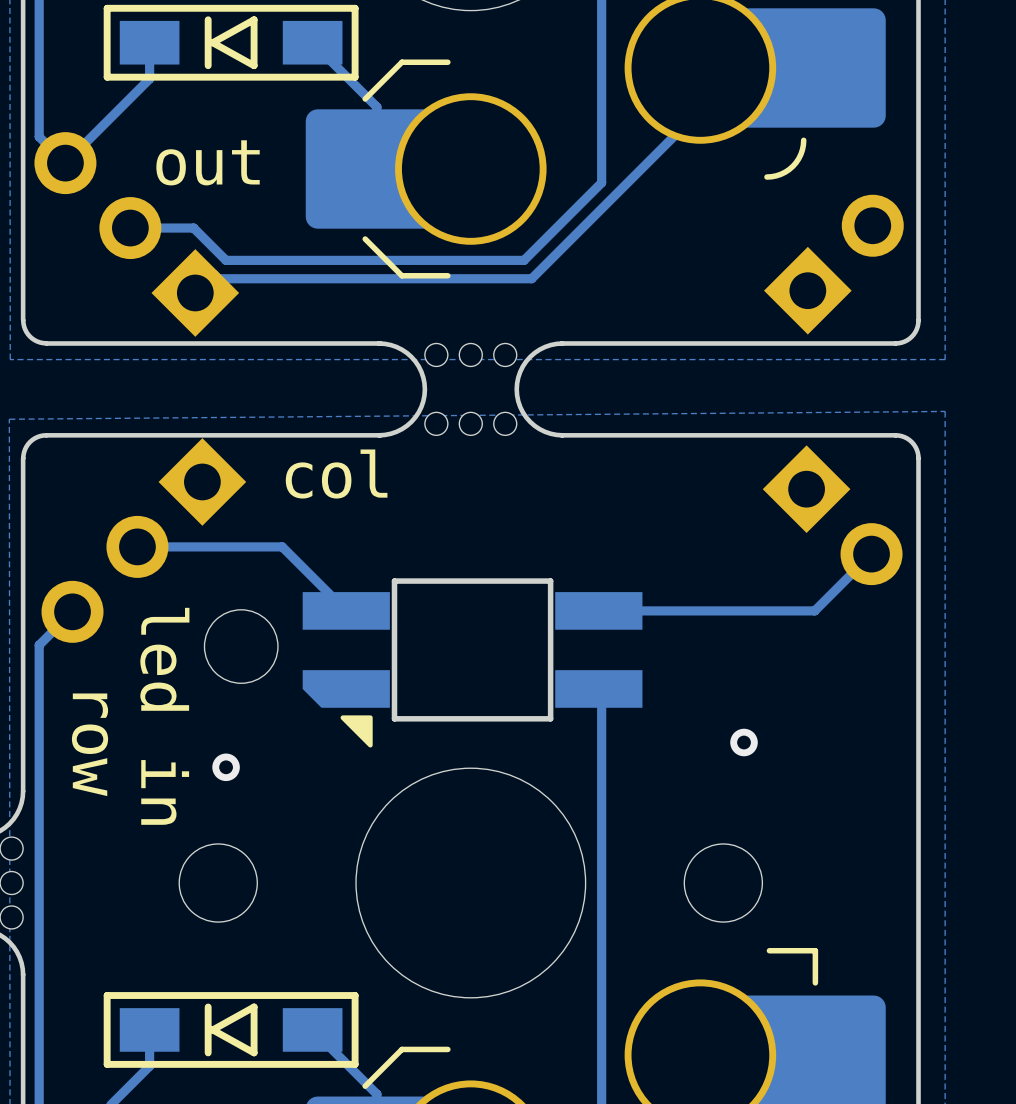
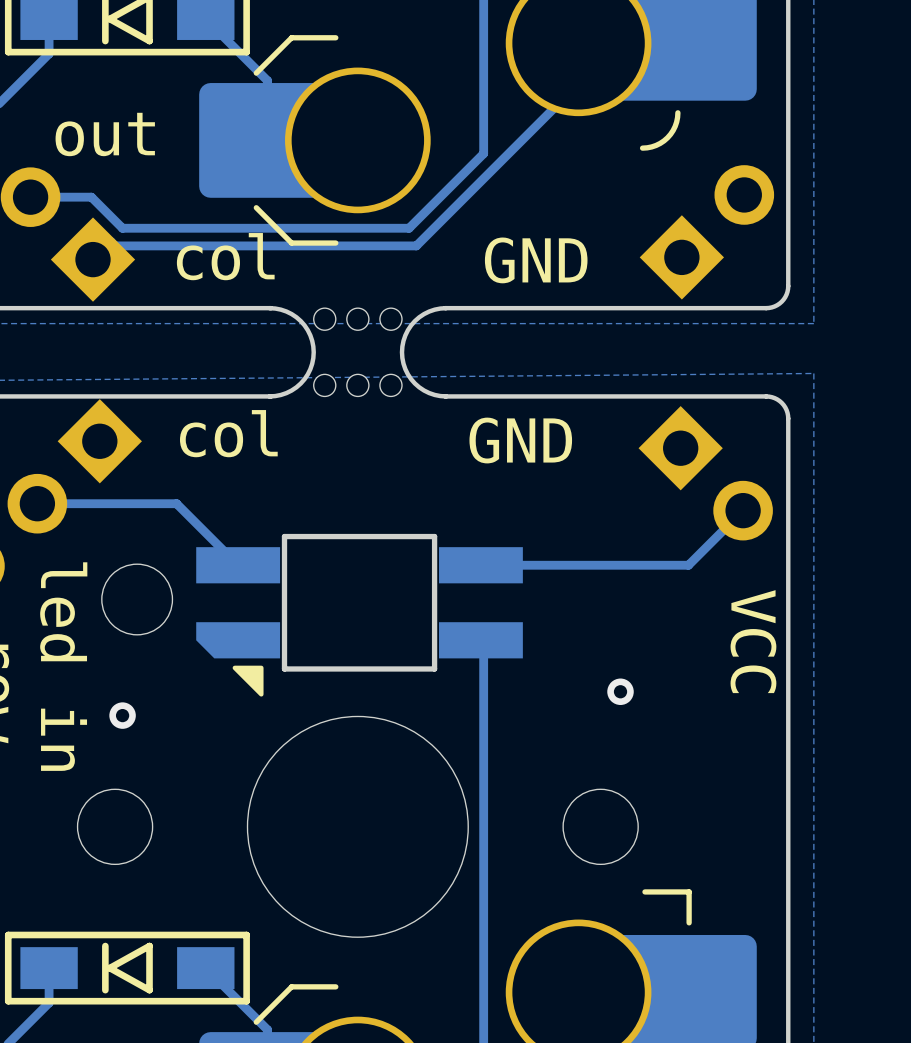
text: none -> col (225, 256)
text: none -> GND (536, 260)
text: none -> GND (520, 440)
text: none -> VCC (753, 641)

